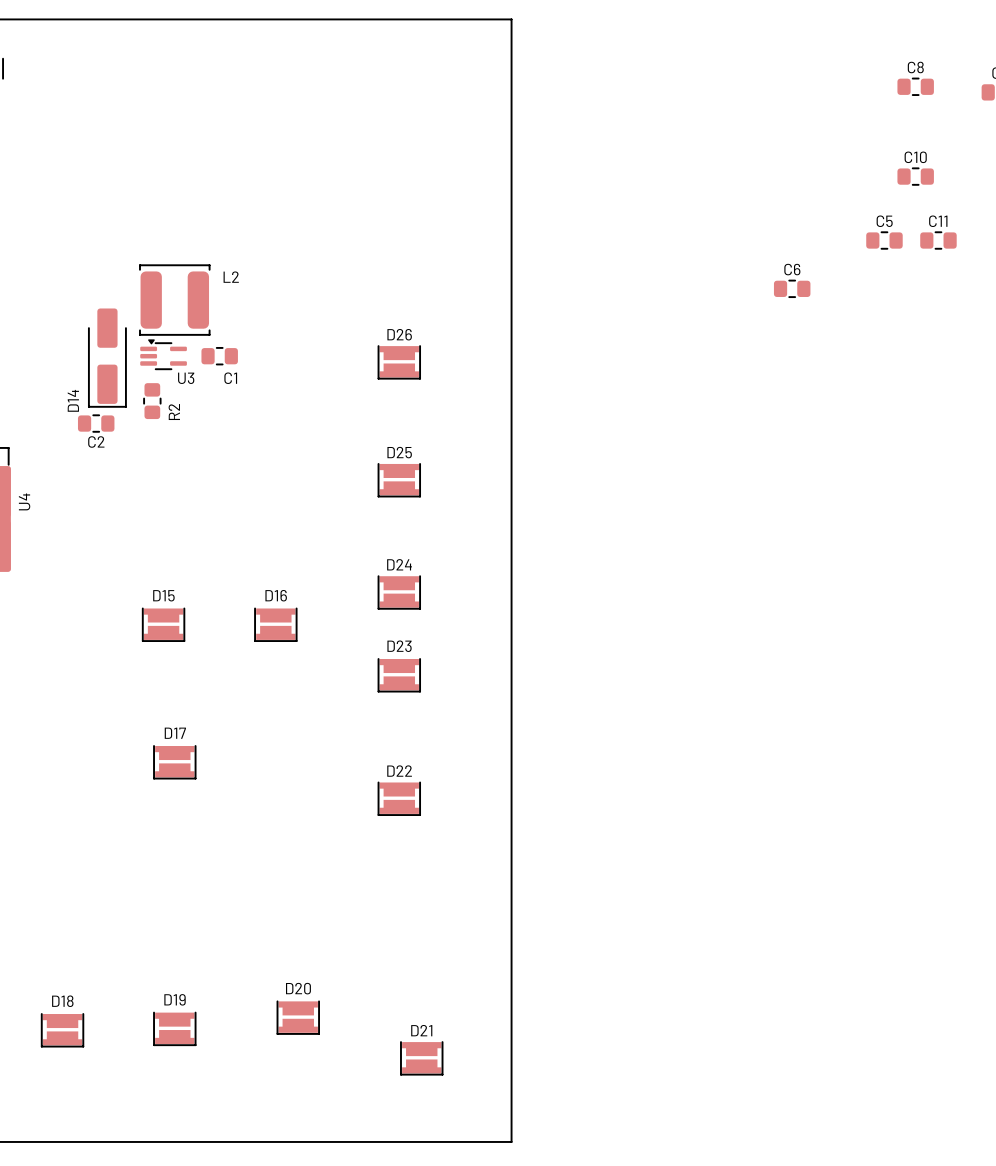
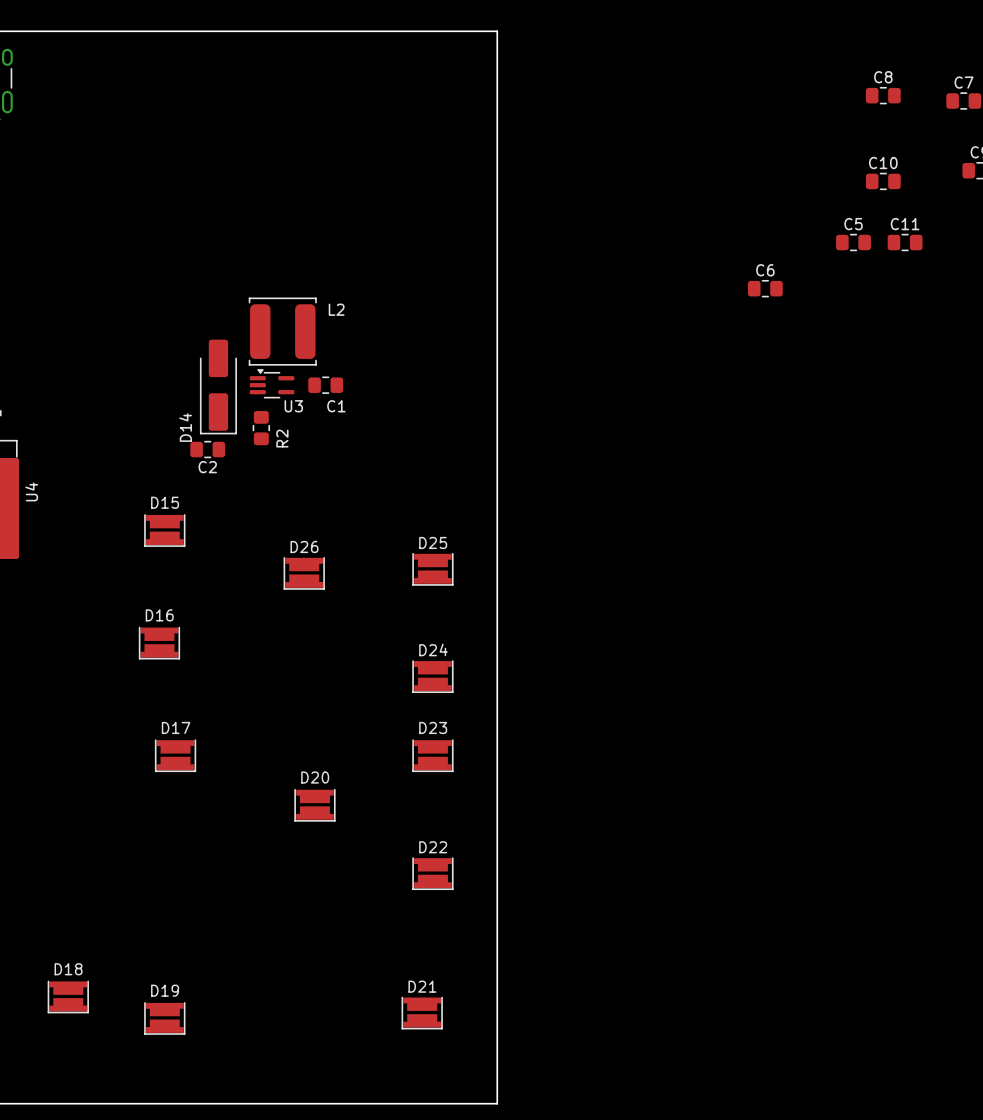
L2 position: (174, 300) -> (282, 331)
U3 position: (163, 354) -> (272, 383)
C1 position: (219, 356) -> (325, 385)
D14 position: (107, 357) -> (218, 386)
D26 position: (399, 362) -> (304, 573)
R2 position: (152, 401) -> (261, 428)
C2 position: (96, 423) -> (207, 449)
D25 position: (399, 480) -> (432, 569)
D24 position: (399, 592) -> (432, 676)
D15 position: (163, 624) -> (164, 530)
D16 position: (275, 624) -> (159, 643)
D23 position: (399, 675) -> (432, 755)
D17 position: (174, 762) -> (175, 755)
D22 position: (399, 798) -> (432, 873)
D20 position: (298, 1017) -> (314, 805)
D19 position: (174, 1028) -> (164, 1018)
D21 position: (421, 1058) -> (422, 1013)

